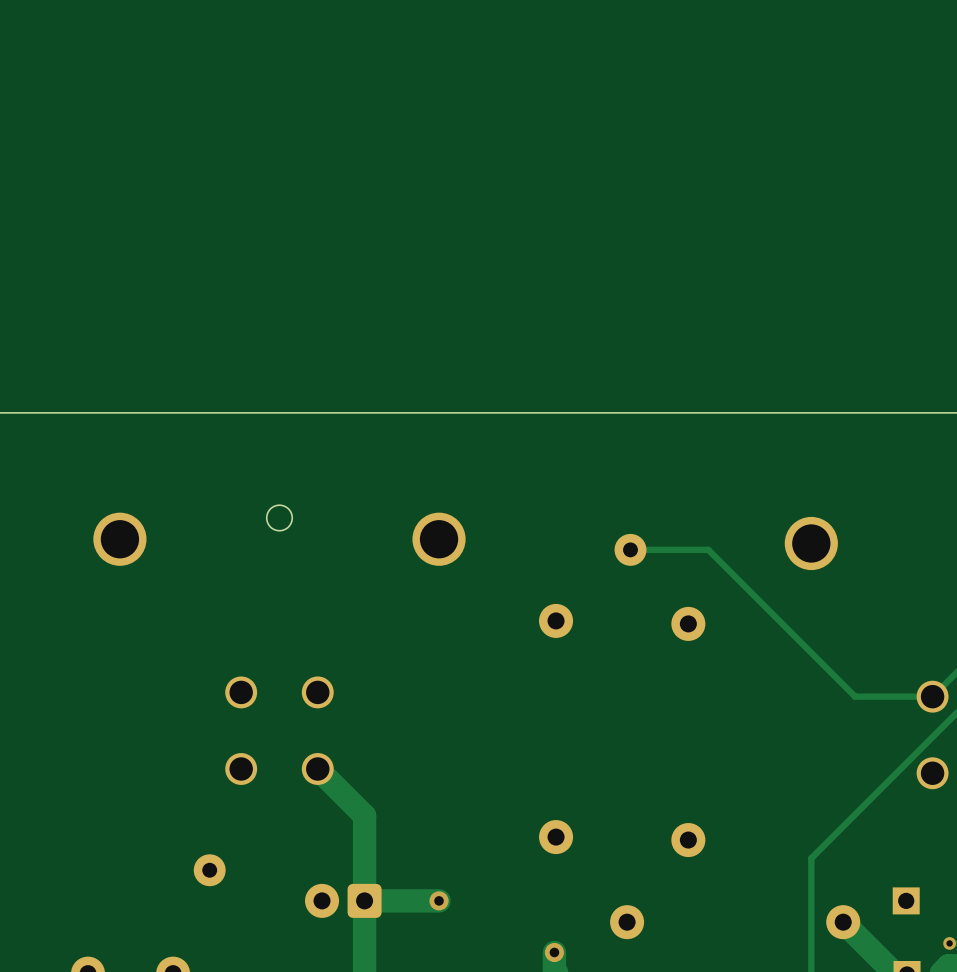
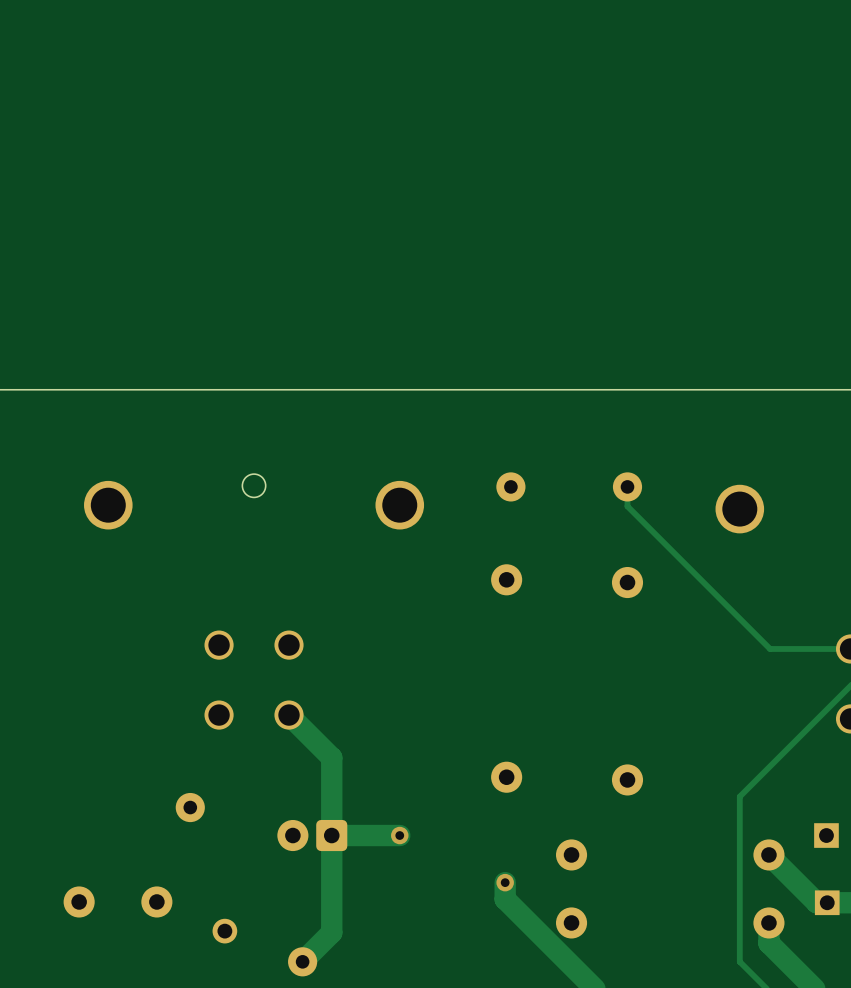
part: none -> (510, 486)
part: none -> (627, 486)
track: (630, 549) (708, 549) (855, 696) -> (627, 486) (627, 506) (770, 648) (779, 648)
part: (630, 549) -> none

